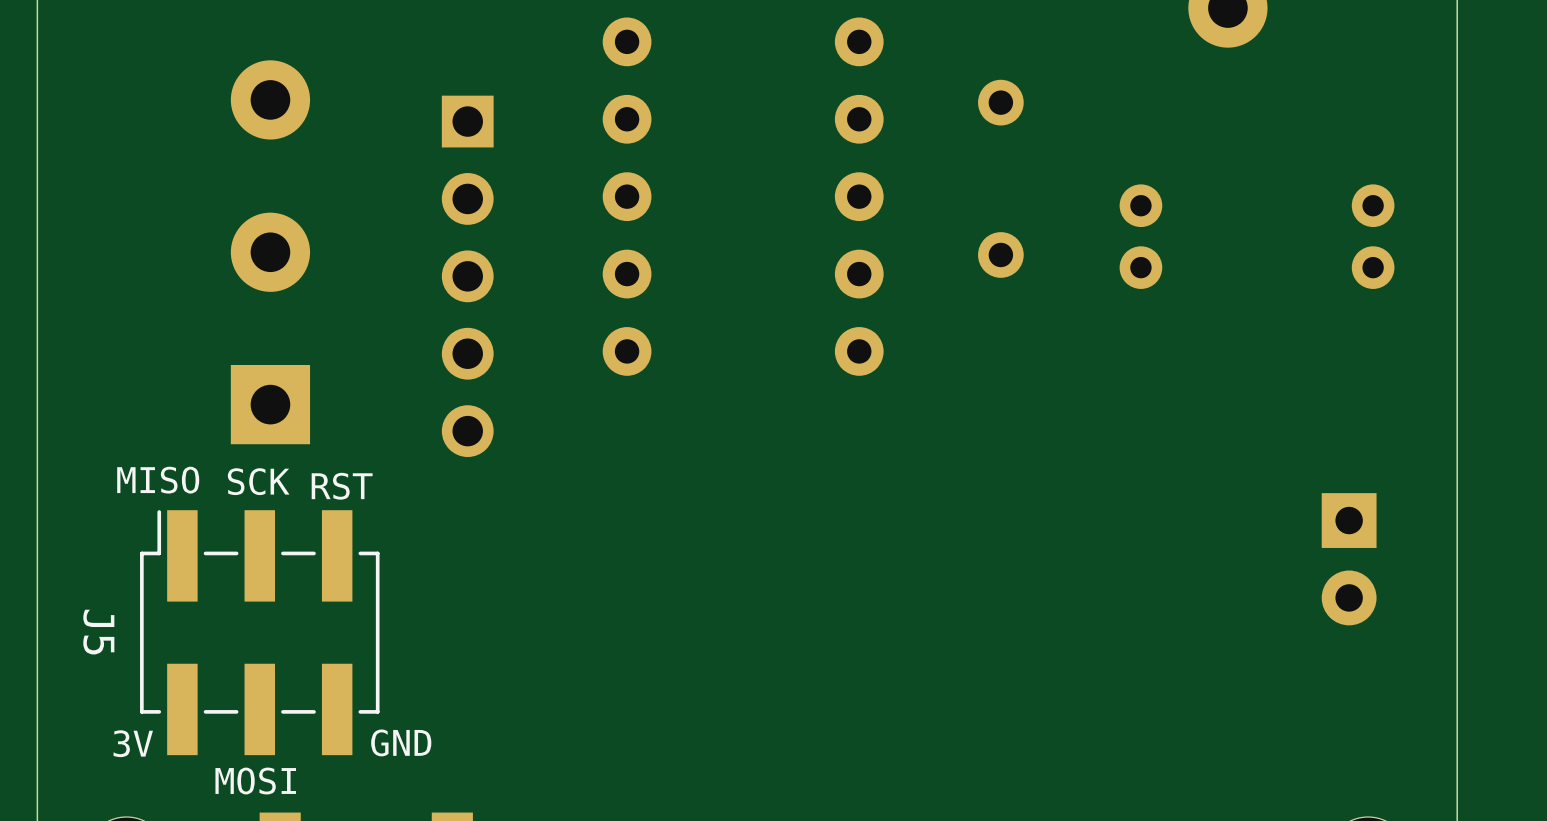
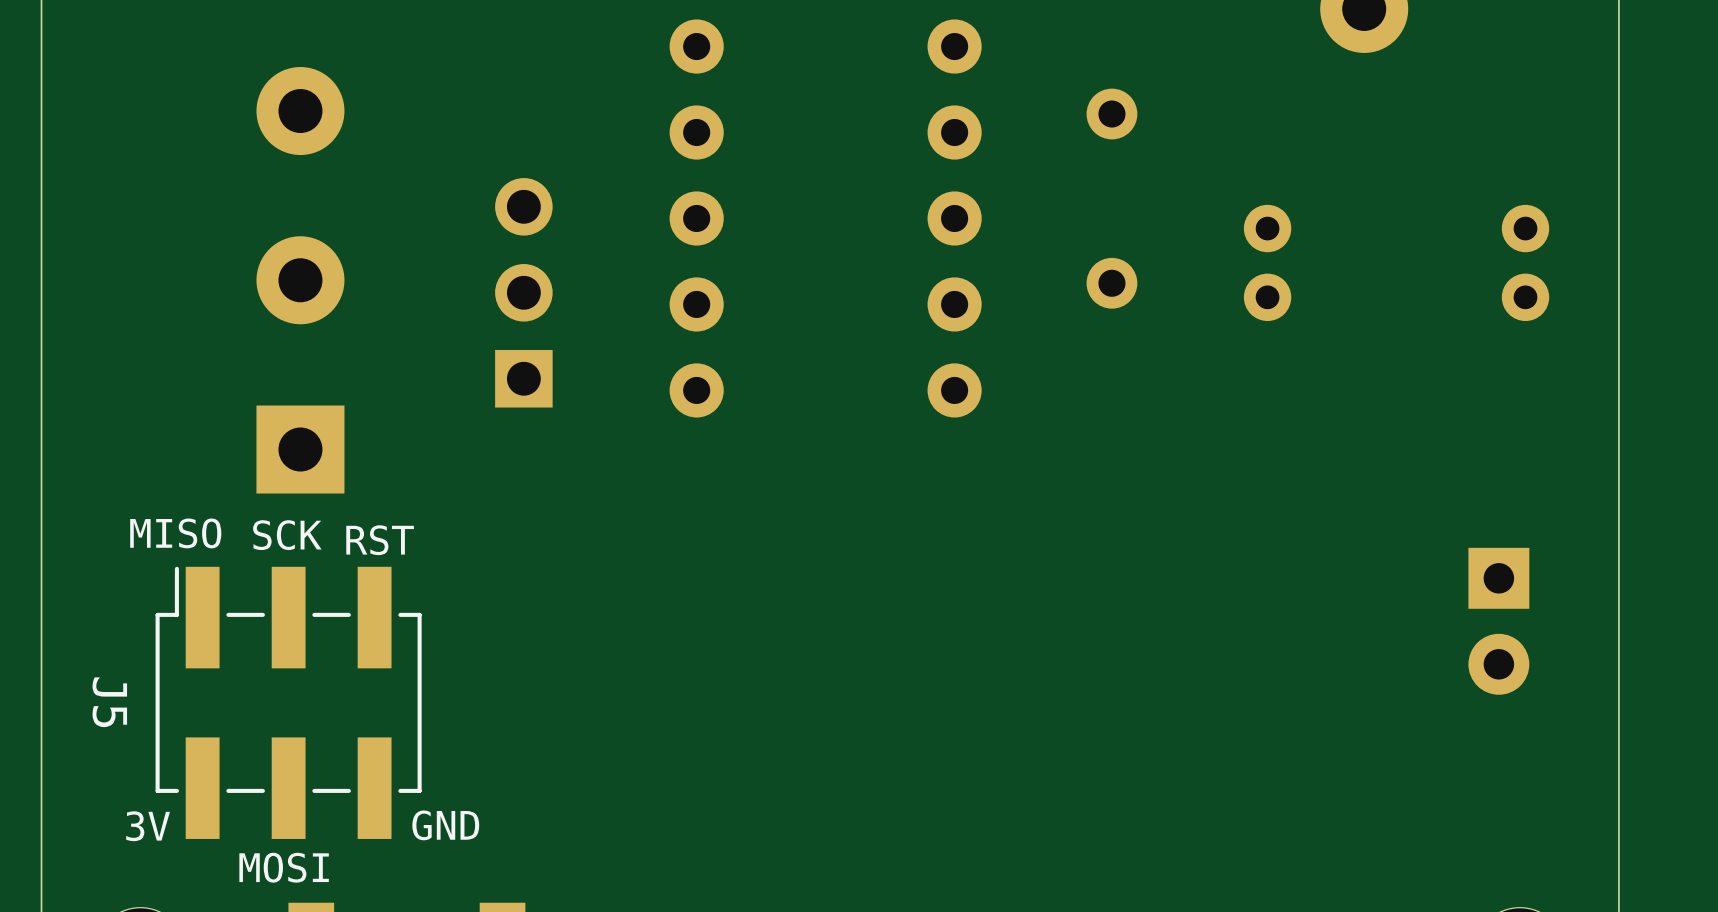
part footprint: [441, 95, 494, 458] -> [495, 178, 553, 408]

